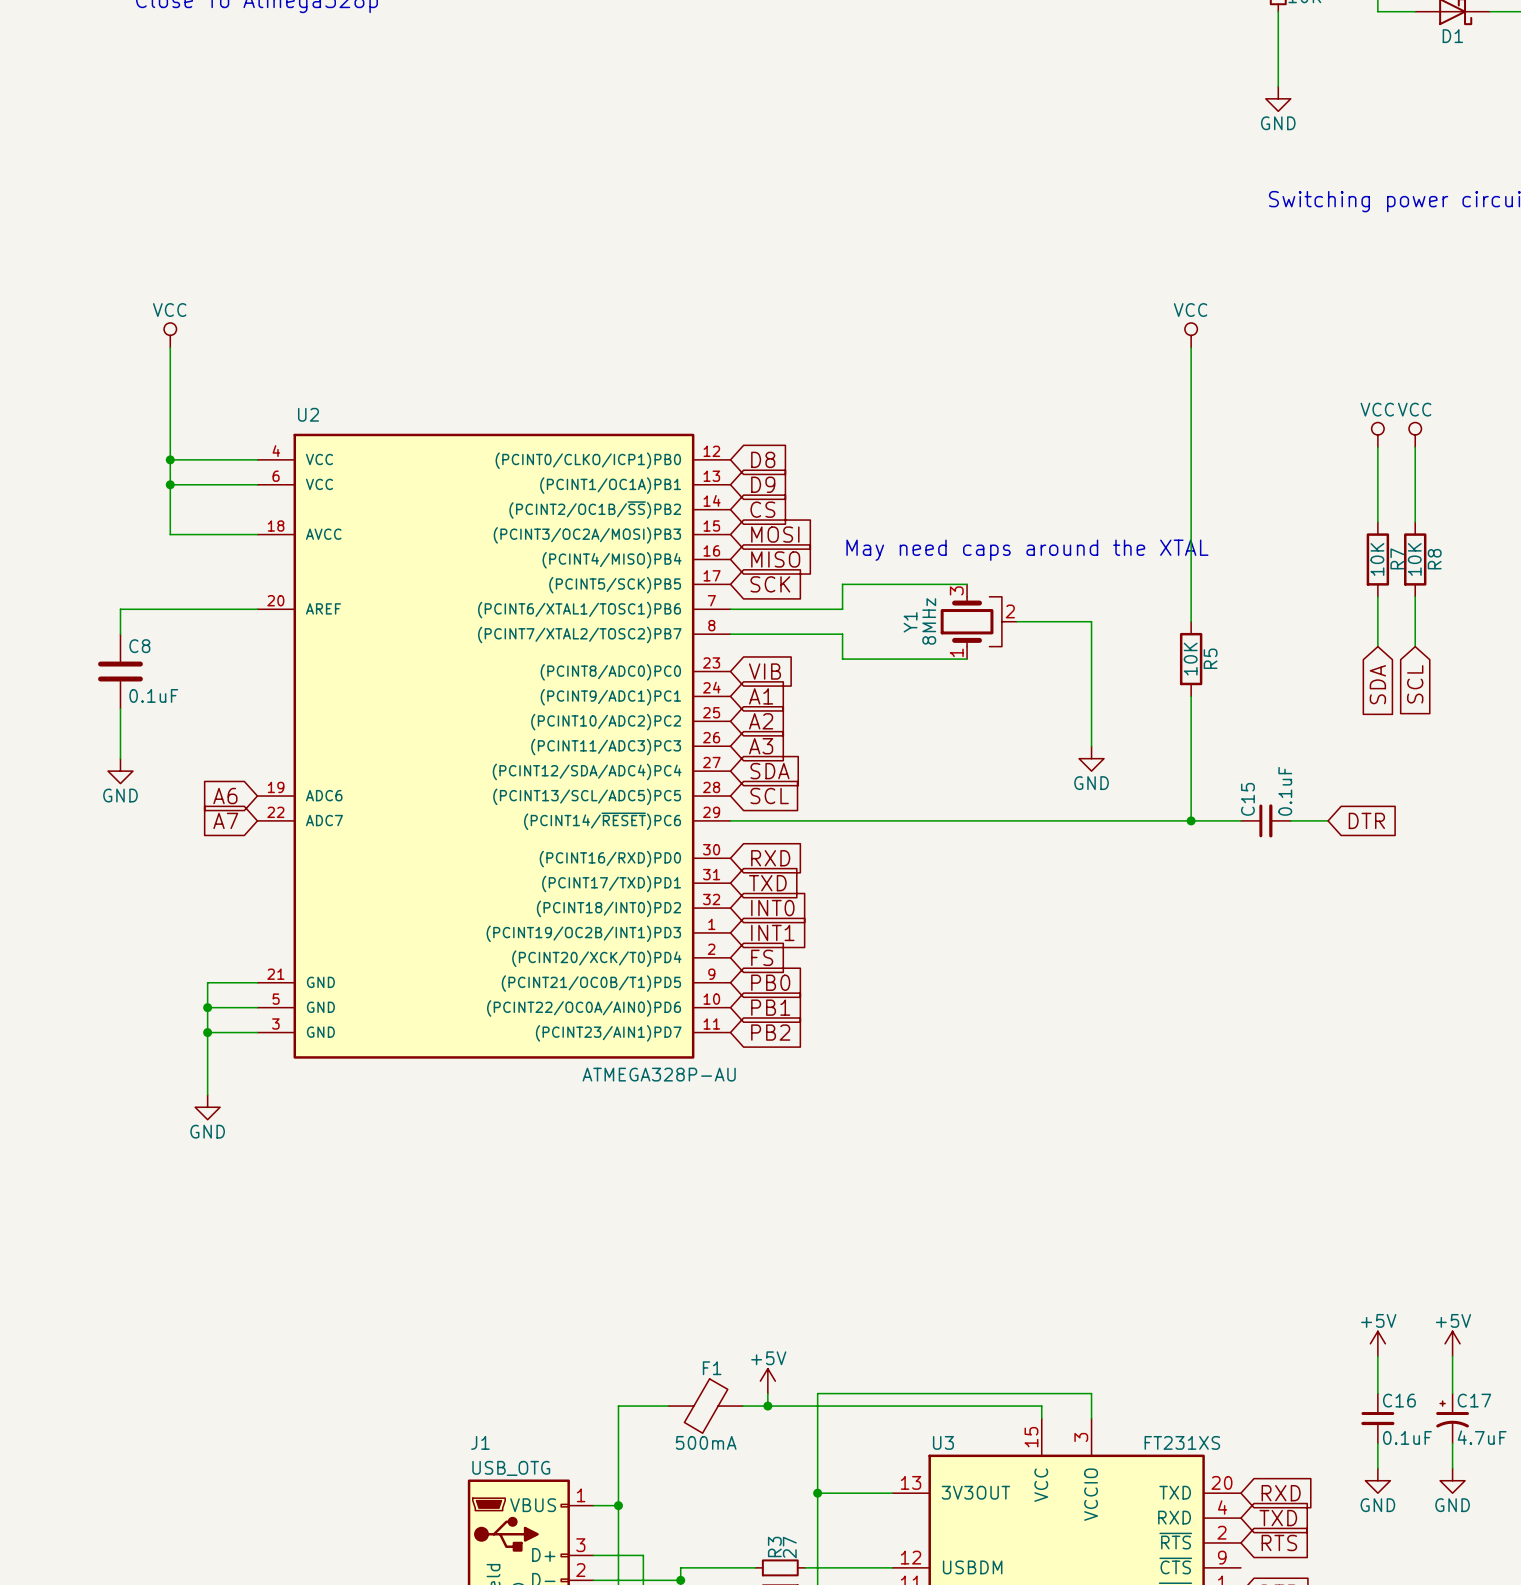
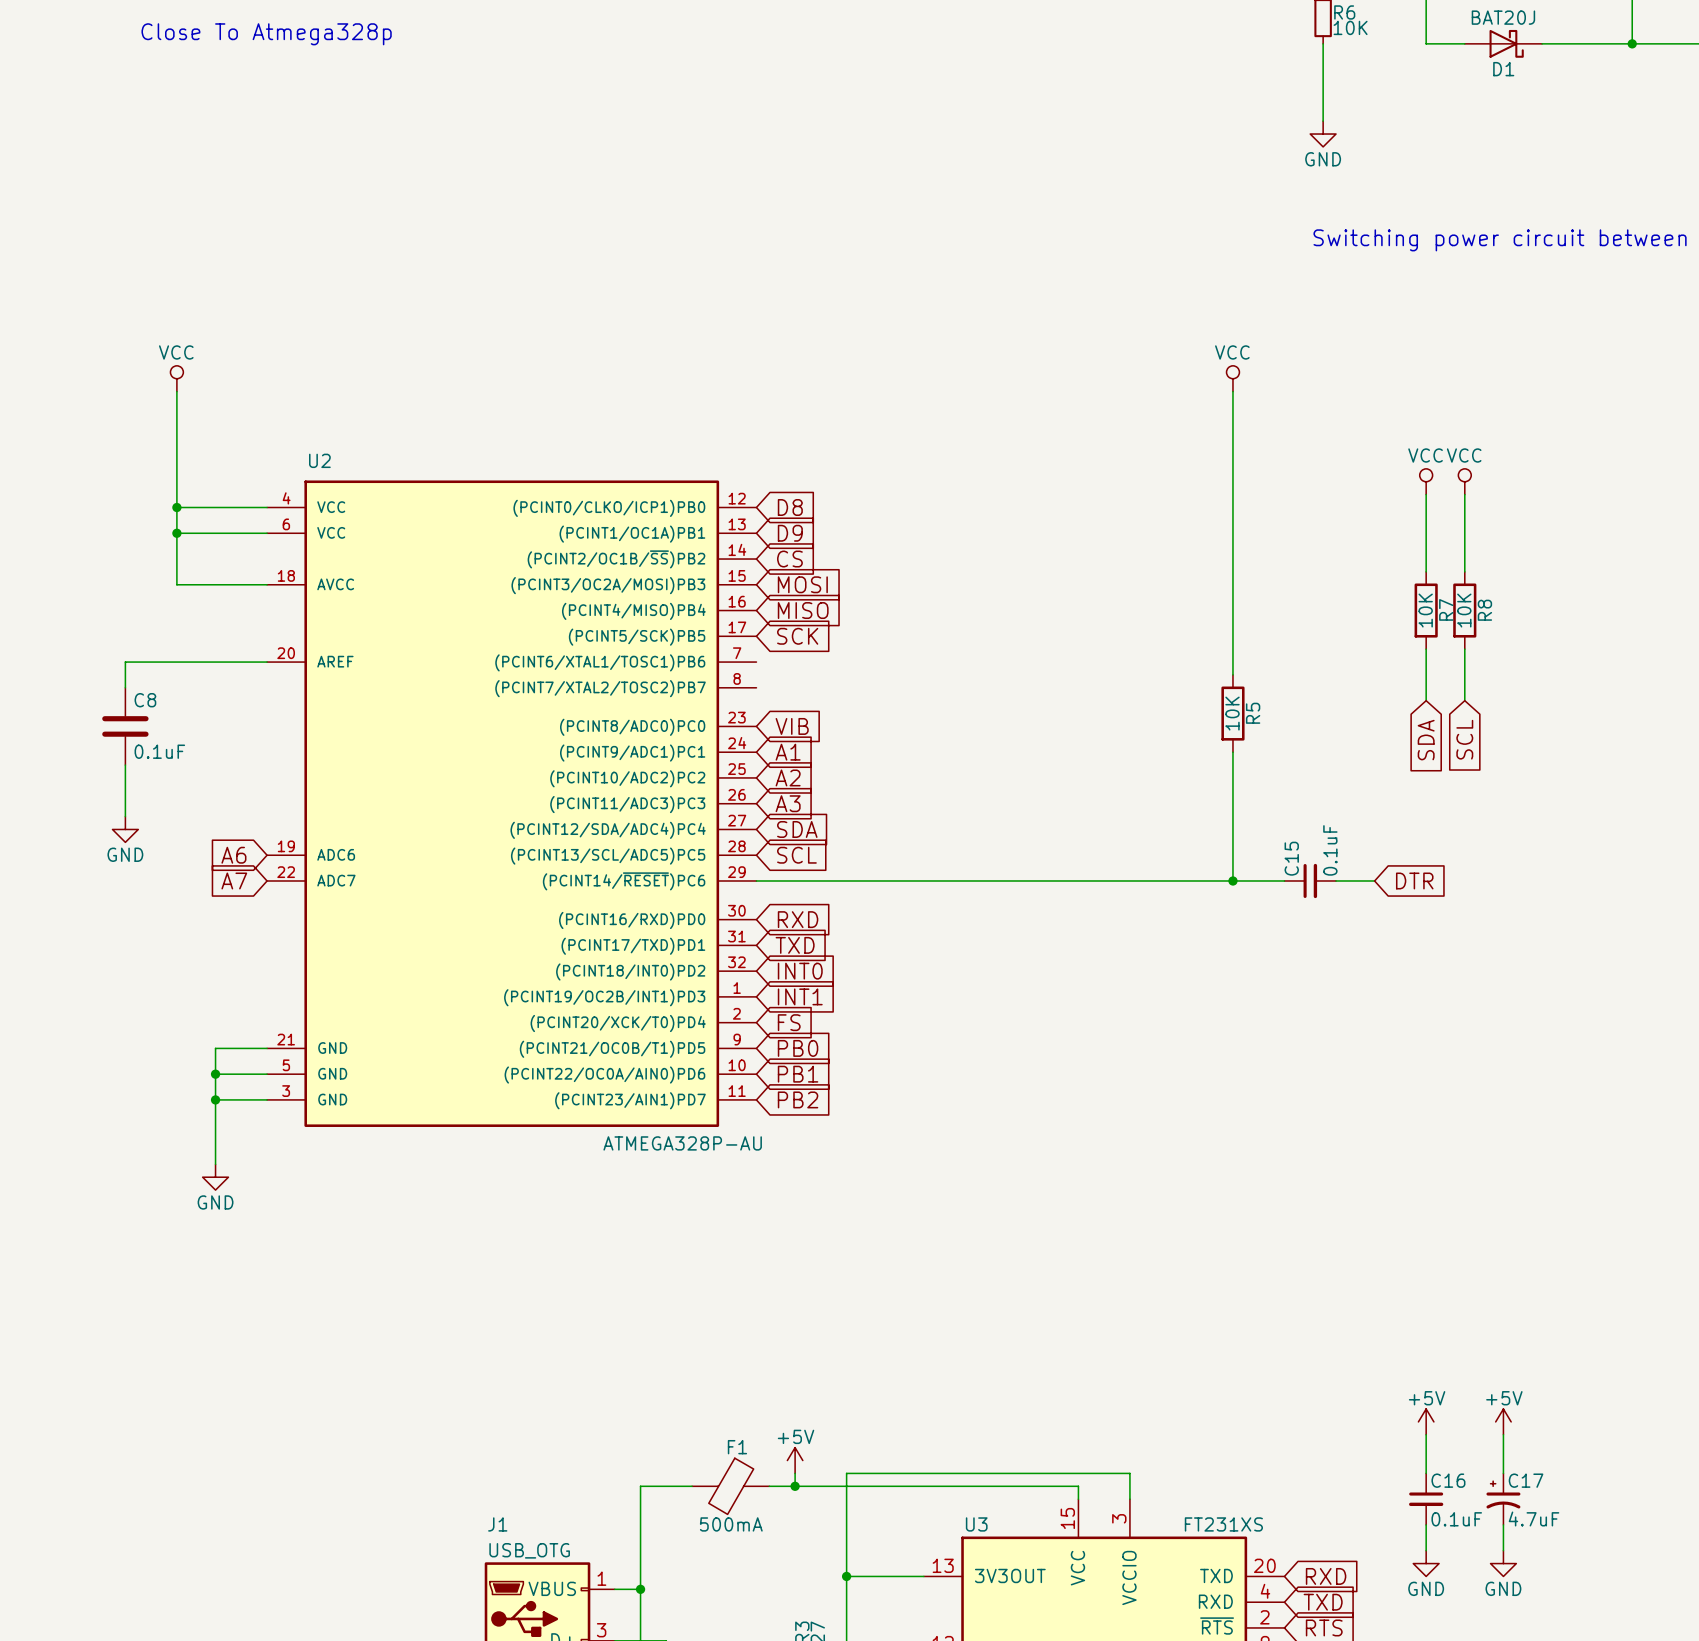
text: May need caps around the XTAL (1027, 550) -> none
wire: (967, 584) (842, 584) (842, 609) (730, 609) -> none
Y1: 8MHz (978, 621) -> none
wire: (1016, 621) (1091, 621) (1091, 746) -> none
wire: (730, 634) (842, 634) (842, 659) (967, 659) -> none
power symbol: GND (1091, 758) -> none

